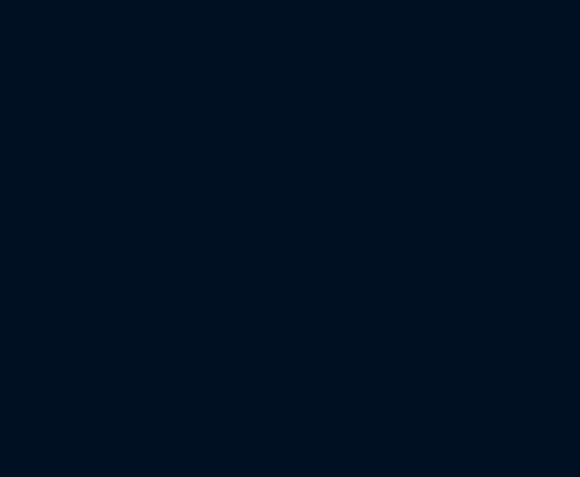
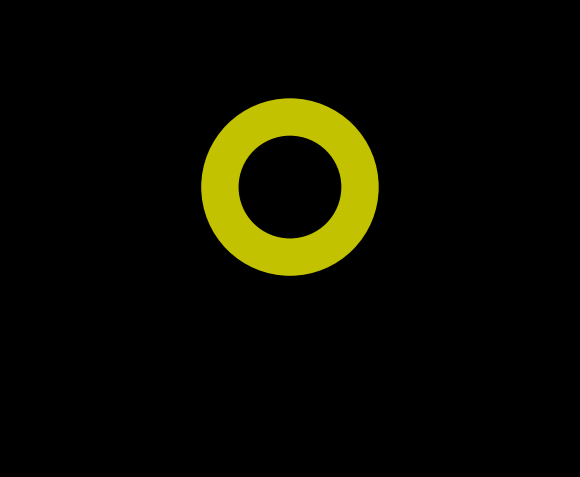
part: none -> (289, 187)

